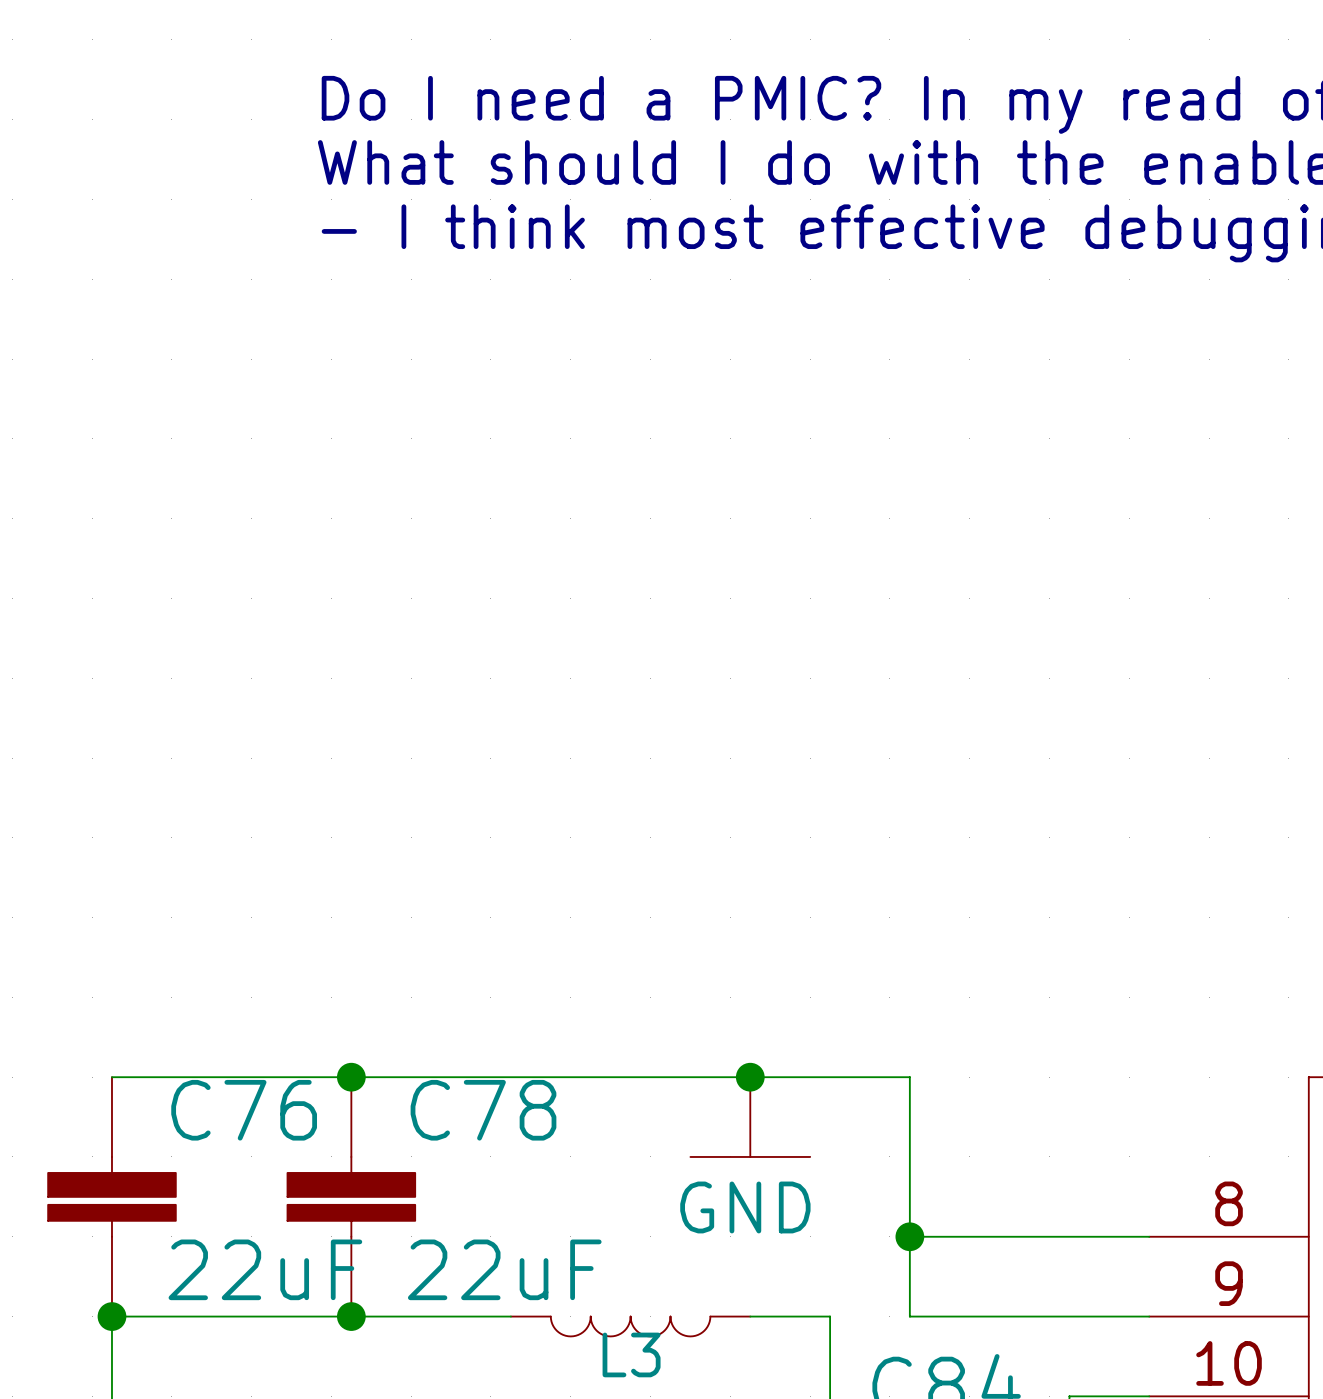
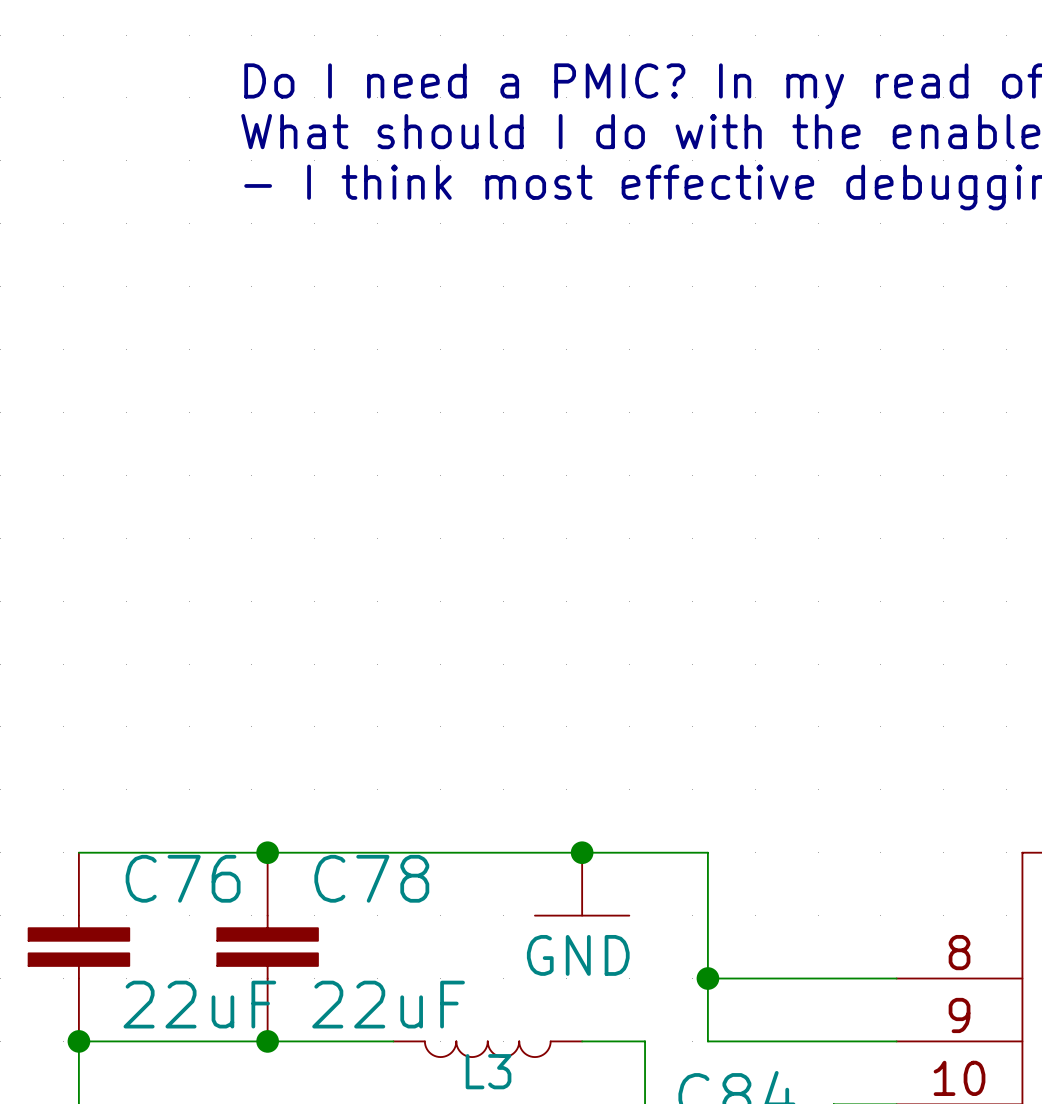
C76 symbol: [48, 1077, 176, 1317] -> [28, 852, 130, 1042]
C78 symbol: [287, 1077, 416, 1317] -> [217, 852, 318, 1042]

